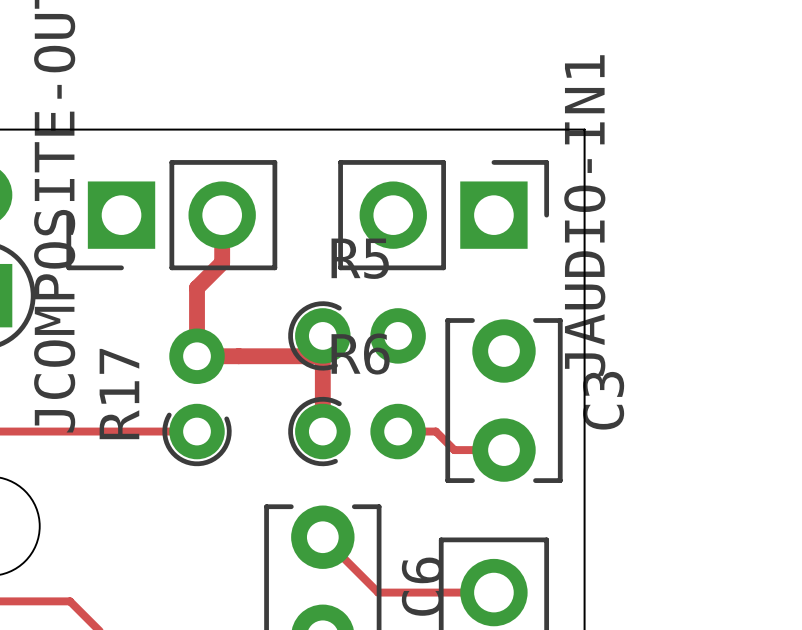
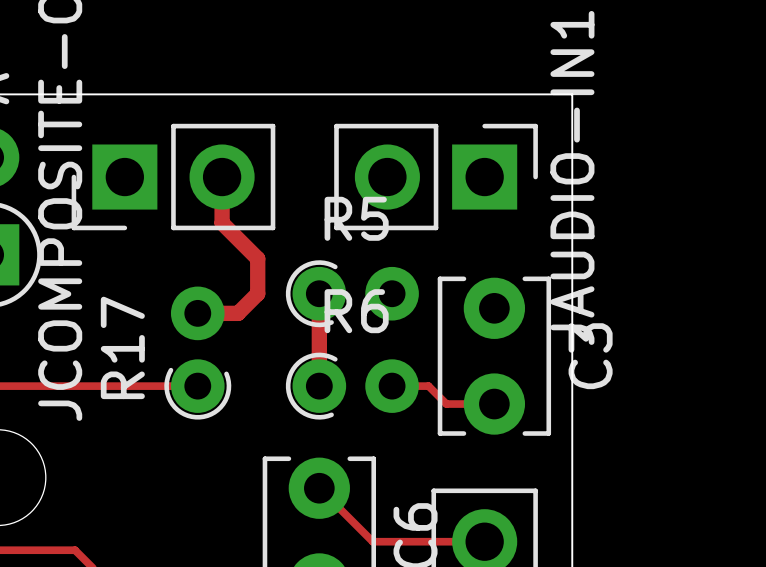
track: (222, 262) (197, 287) (197, 356) -> (222, 223) (257, 258) (257, 293) (238, 313)
track: (238, 356) (322, 356) -> none

